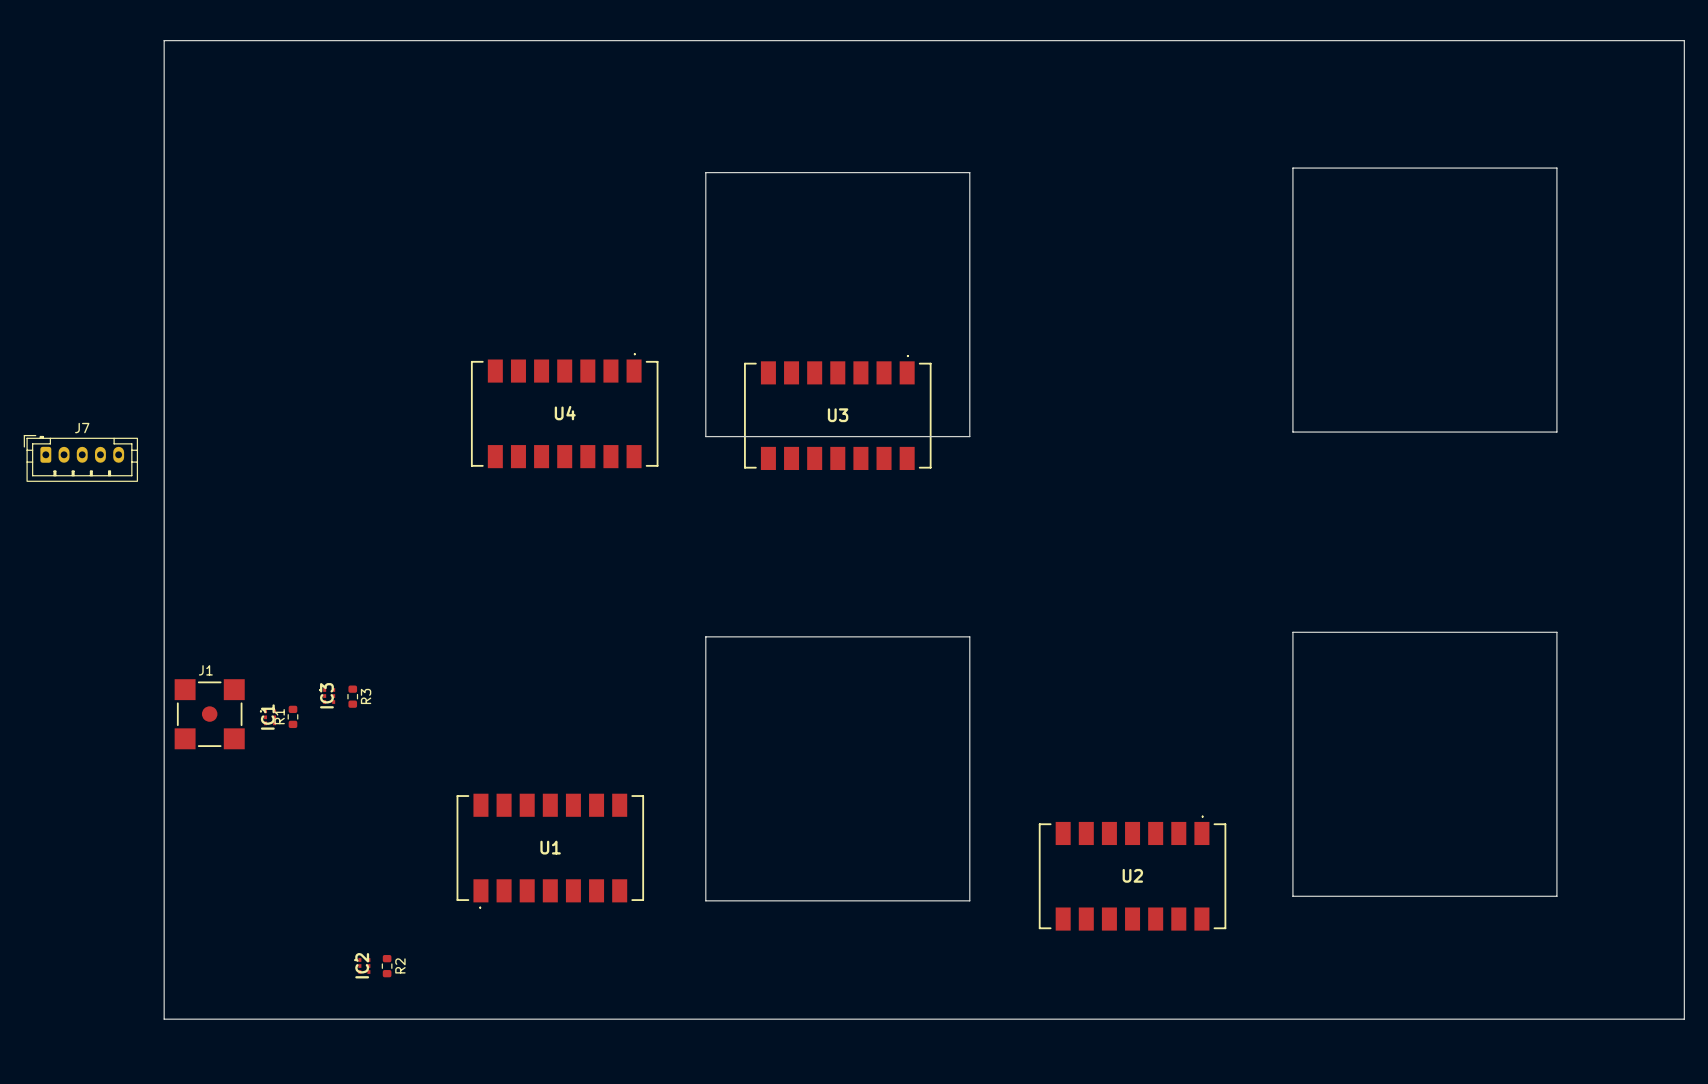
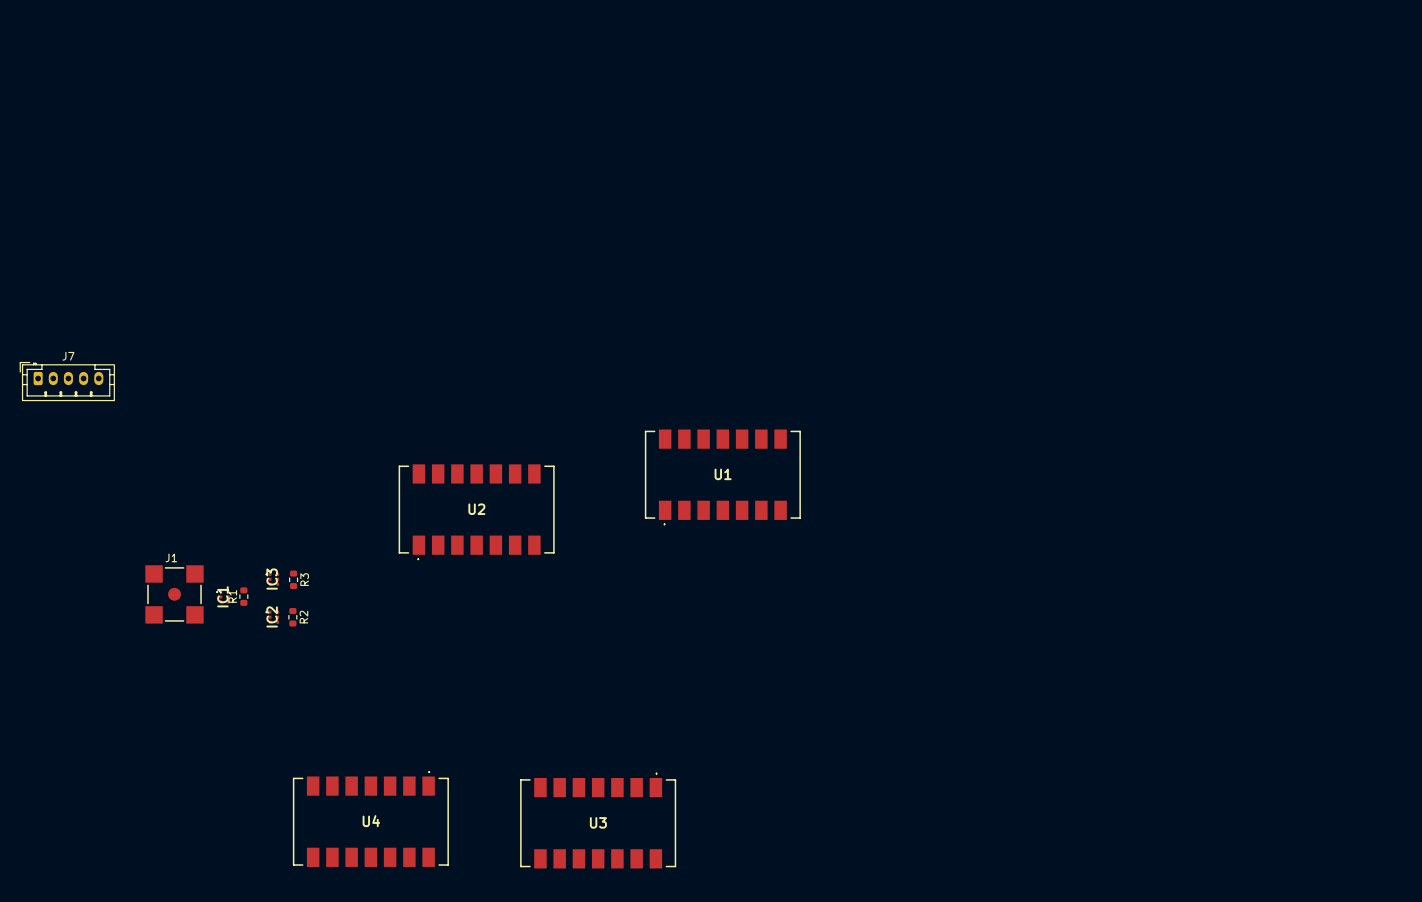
board edge: (164, 40) (1684, 40) (1684, 1019) (164, 1019) (164, 40) -> none
board edge: (1292, 168) (1556, 168) (1556, 432) (1292, 432) (1292, 168) -> none
board edge: (705, 172) (969, 172) (969, 436) (705, 436) (705, 172) -> none
U4 position: (564, 410) -> (370, 819)
U3 position: (837, 412) -> (598, 820)
board edge: (1292, 632) (1292, 896) (1556, 896) (1556, 632) (1292, 632) -> none
board edge: (705, 636) (705, 900) (969, 900) (969, 636) (705, 636) -> none
U1 position: (550, 851) -> (722, 477)
U2 rotation: 0° (1132, 873) -> 180° (476, 512)
U2 position: (1132, 873) -> (476, 512)
IC2 position: (362, 966) -> (272, 617)
R2 position: (387, 966) -> (292, 617)

